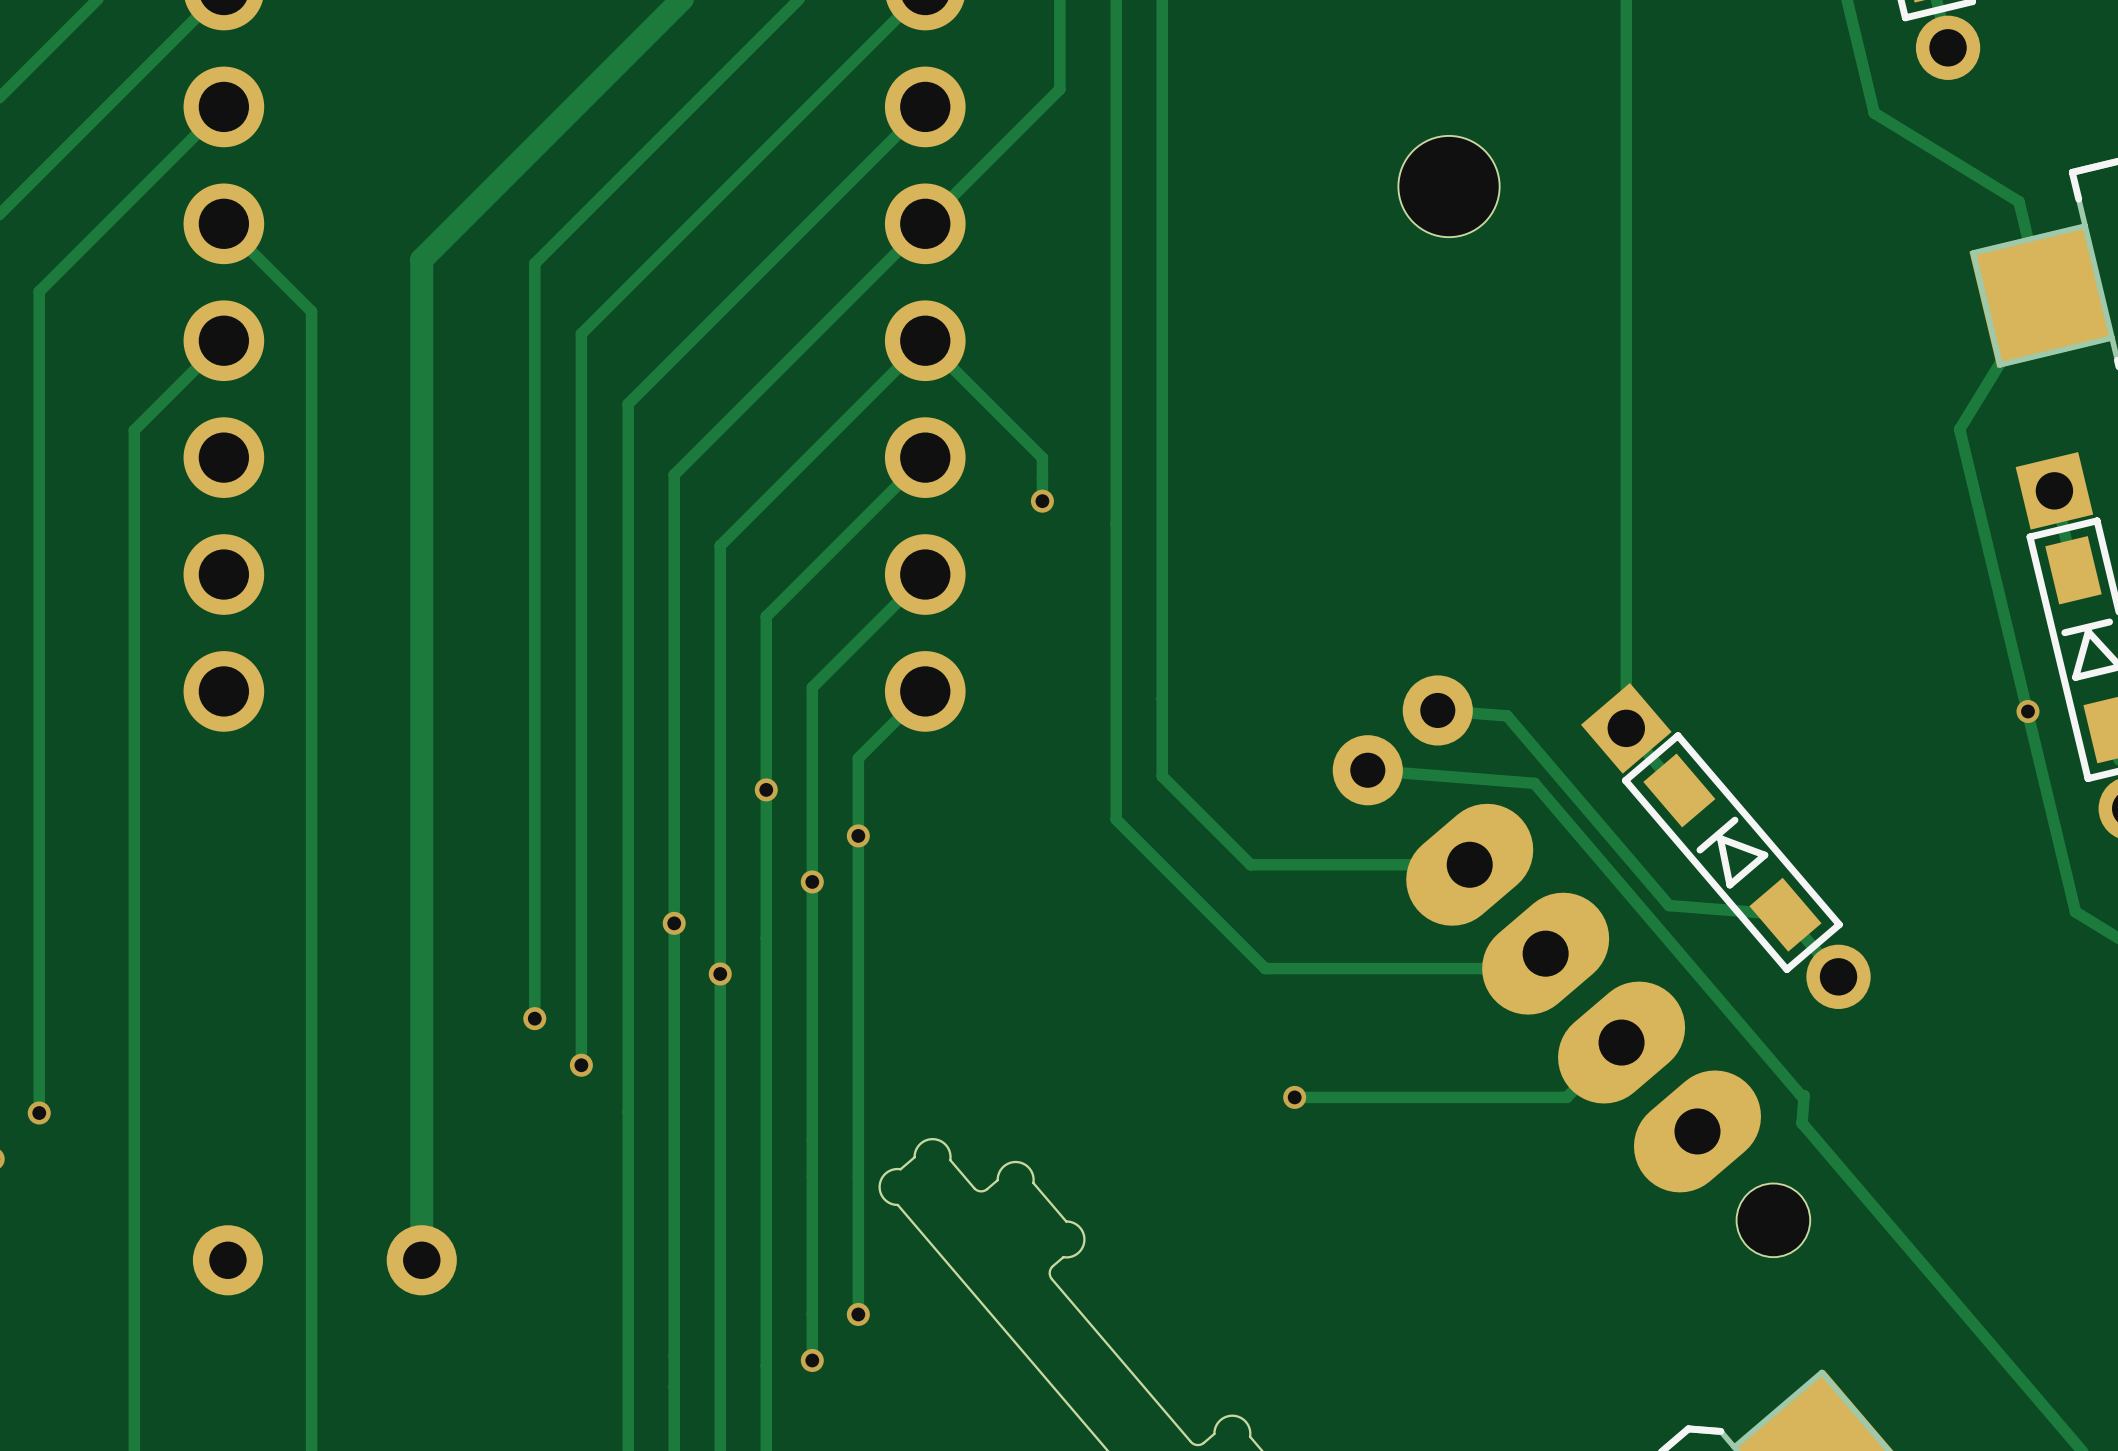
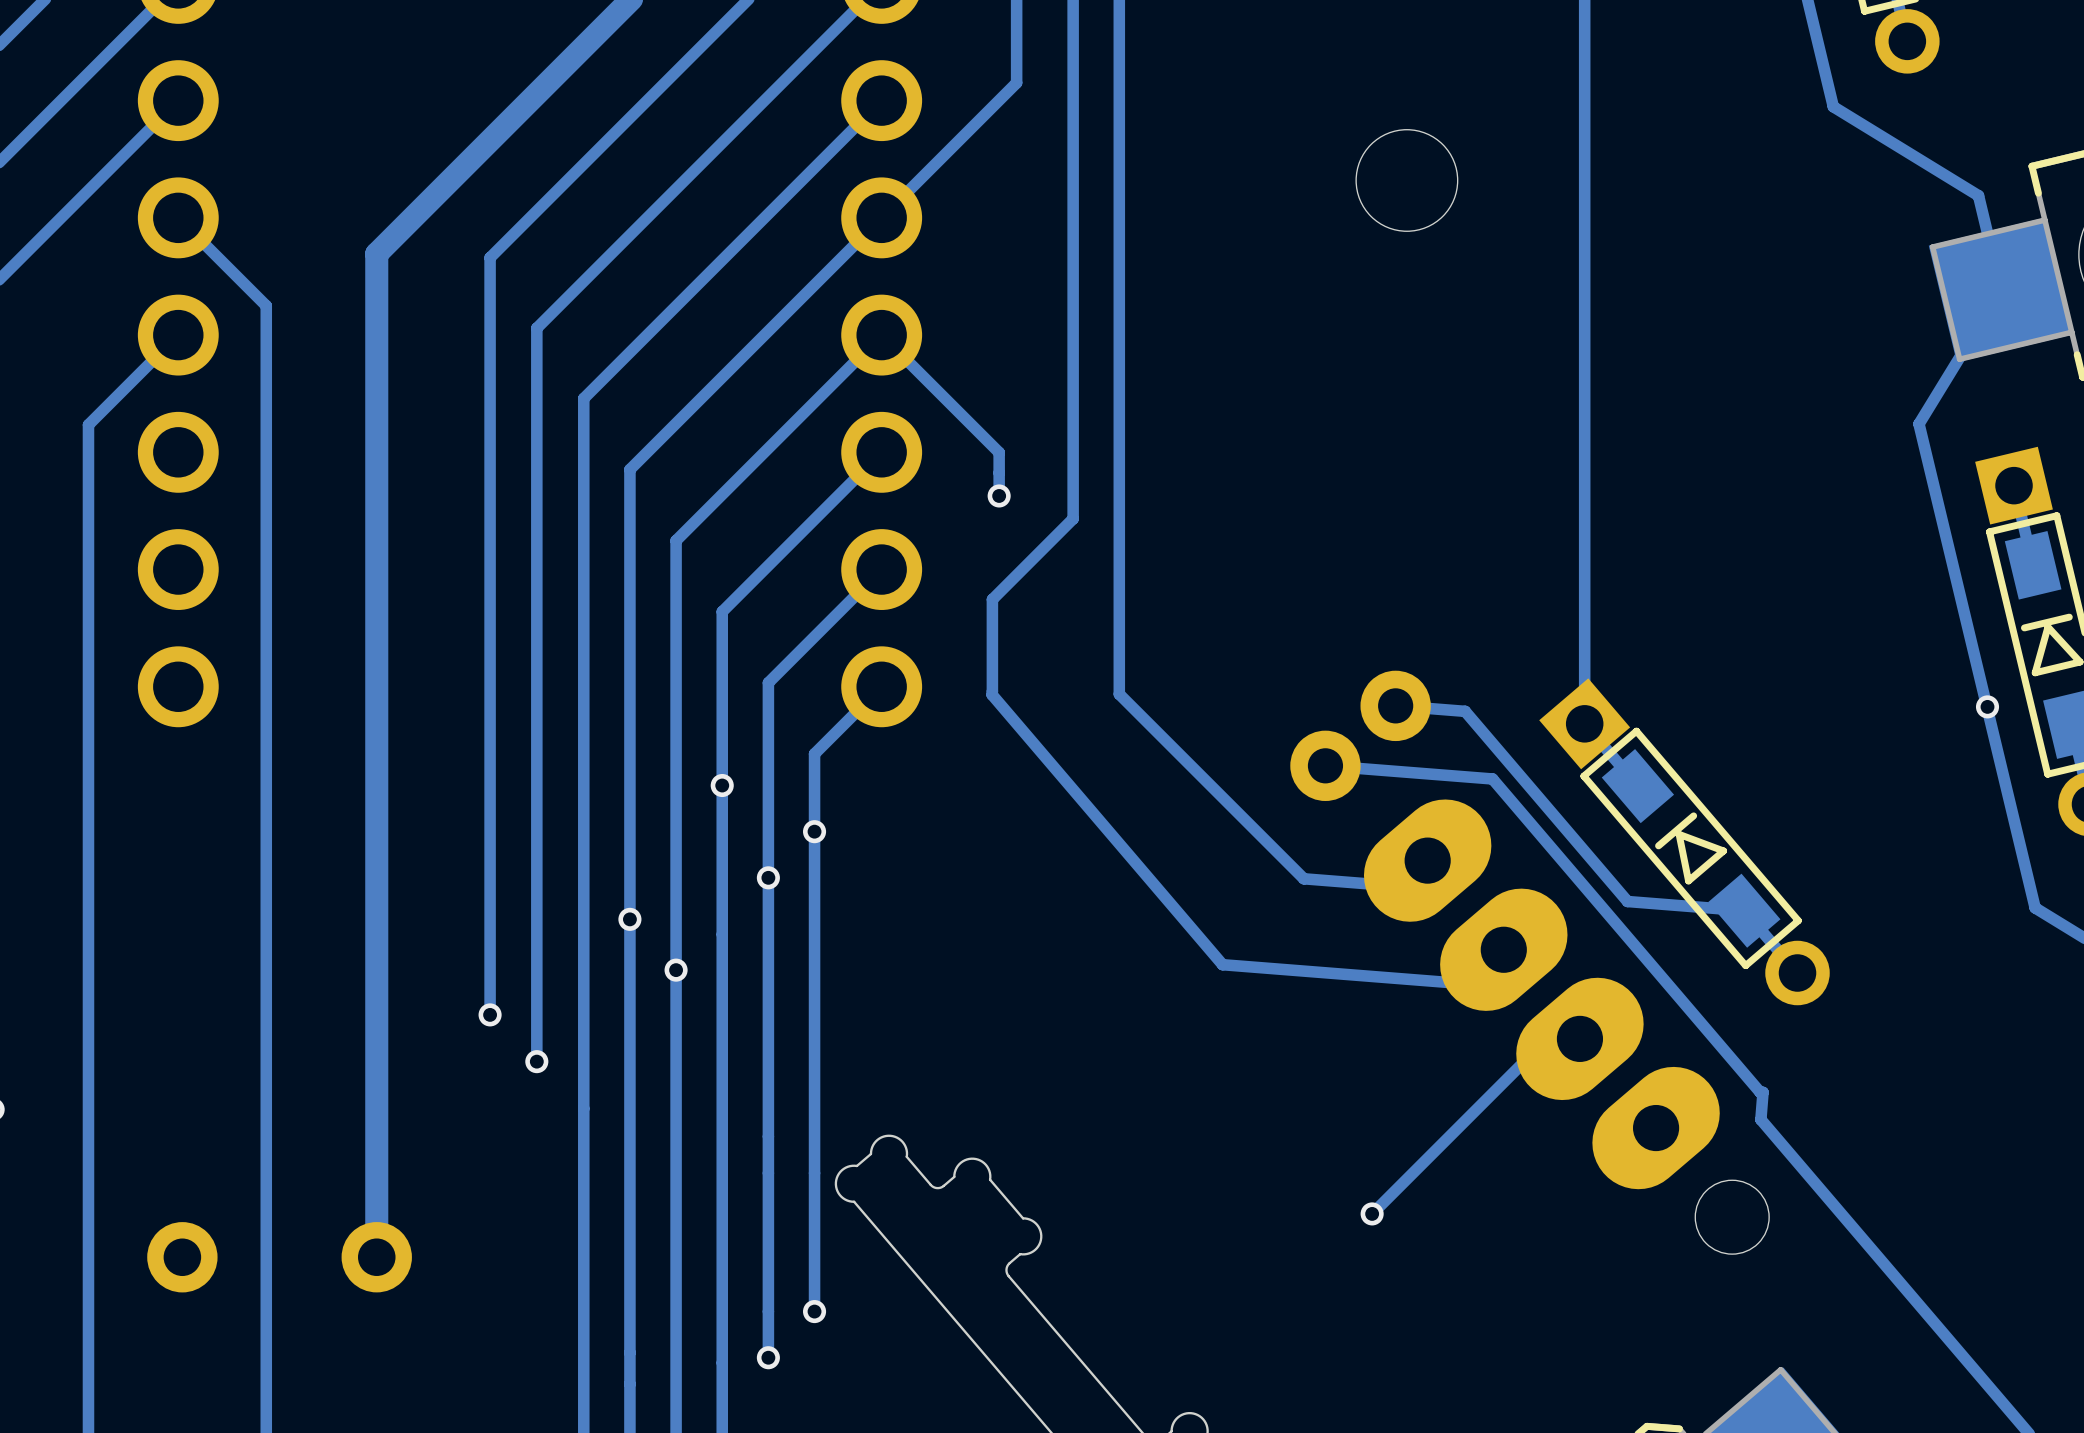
track: (1116, 523) (1116, 819) (1265, 968) (1530, 968) (1545, 953) -> (1073, 518) (992, 599) (992, 694) (1222, 964) (1464, 983) (1503, 949)
track: (1162, 698) (1162, 776) (1250, 864) (1469, 864) -> (1119, 694) (1303, 878) (1397, 886) (1427, 860)
track: (1621, 1042) (1566, 1097) (1294, 1097) -> (1579, 1038) (1547, 1038) (1372, 1213)
via position: (1294, 1097) -> (1372, 1213)

